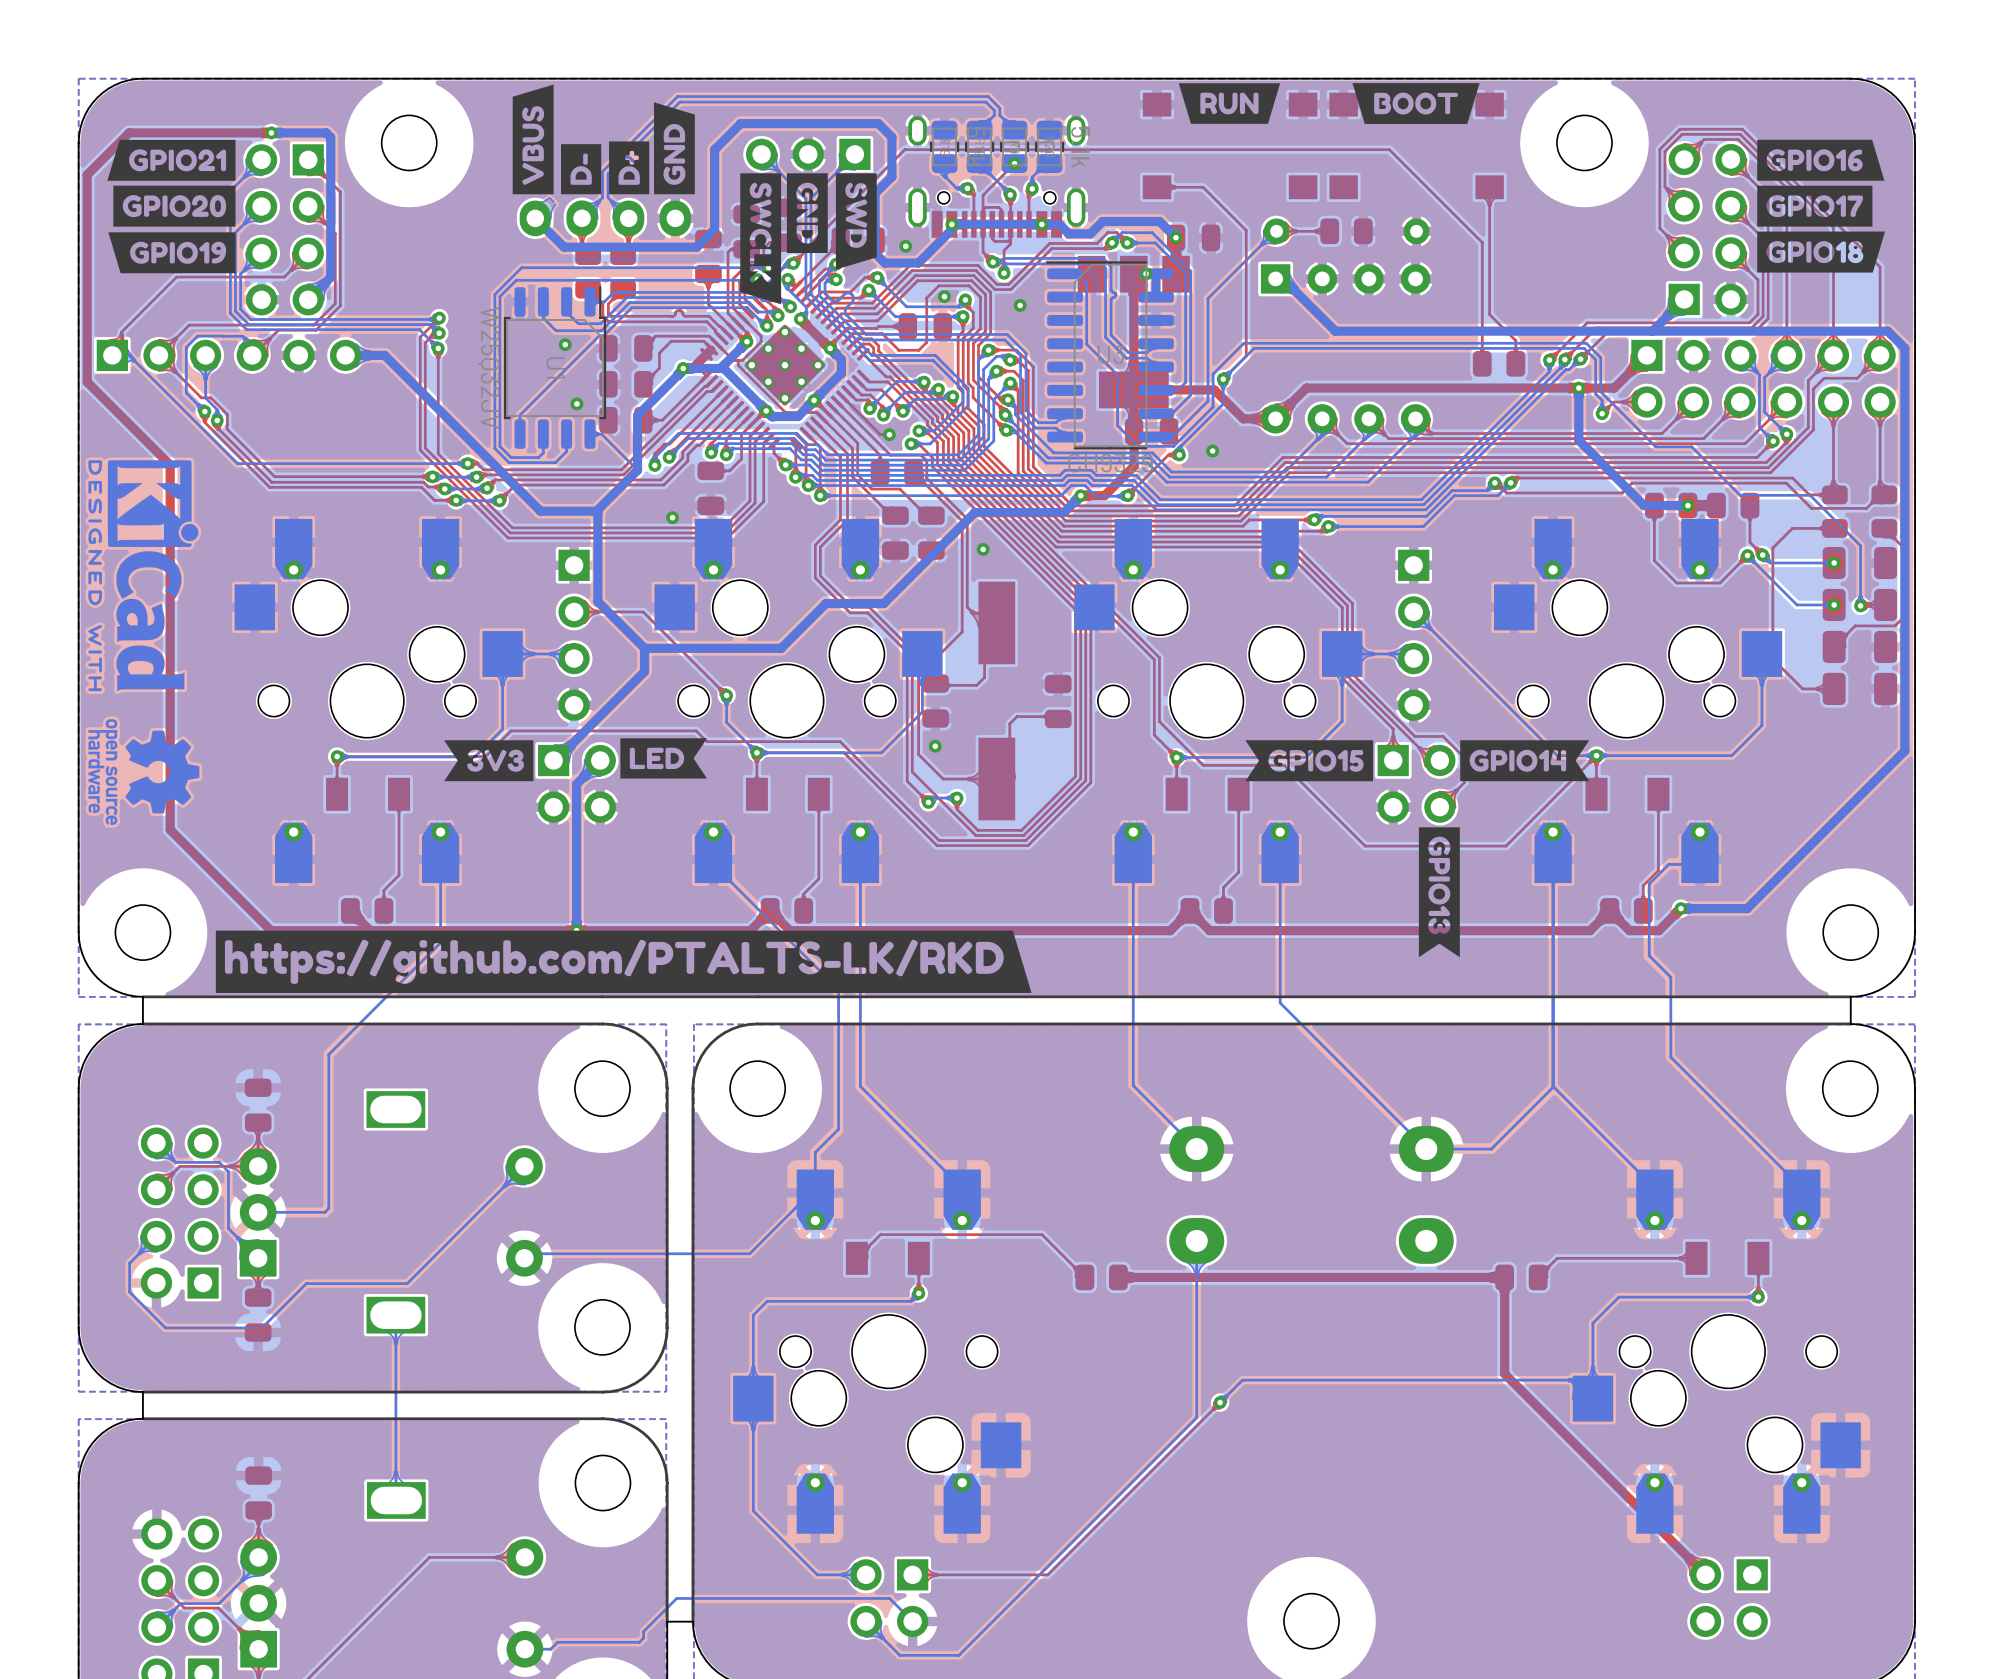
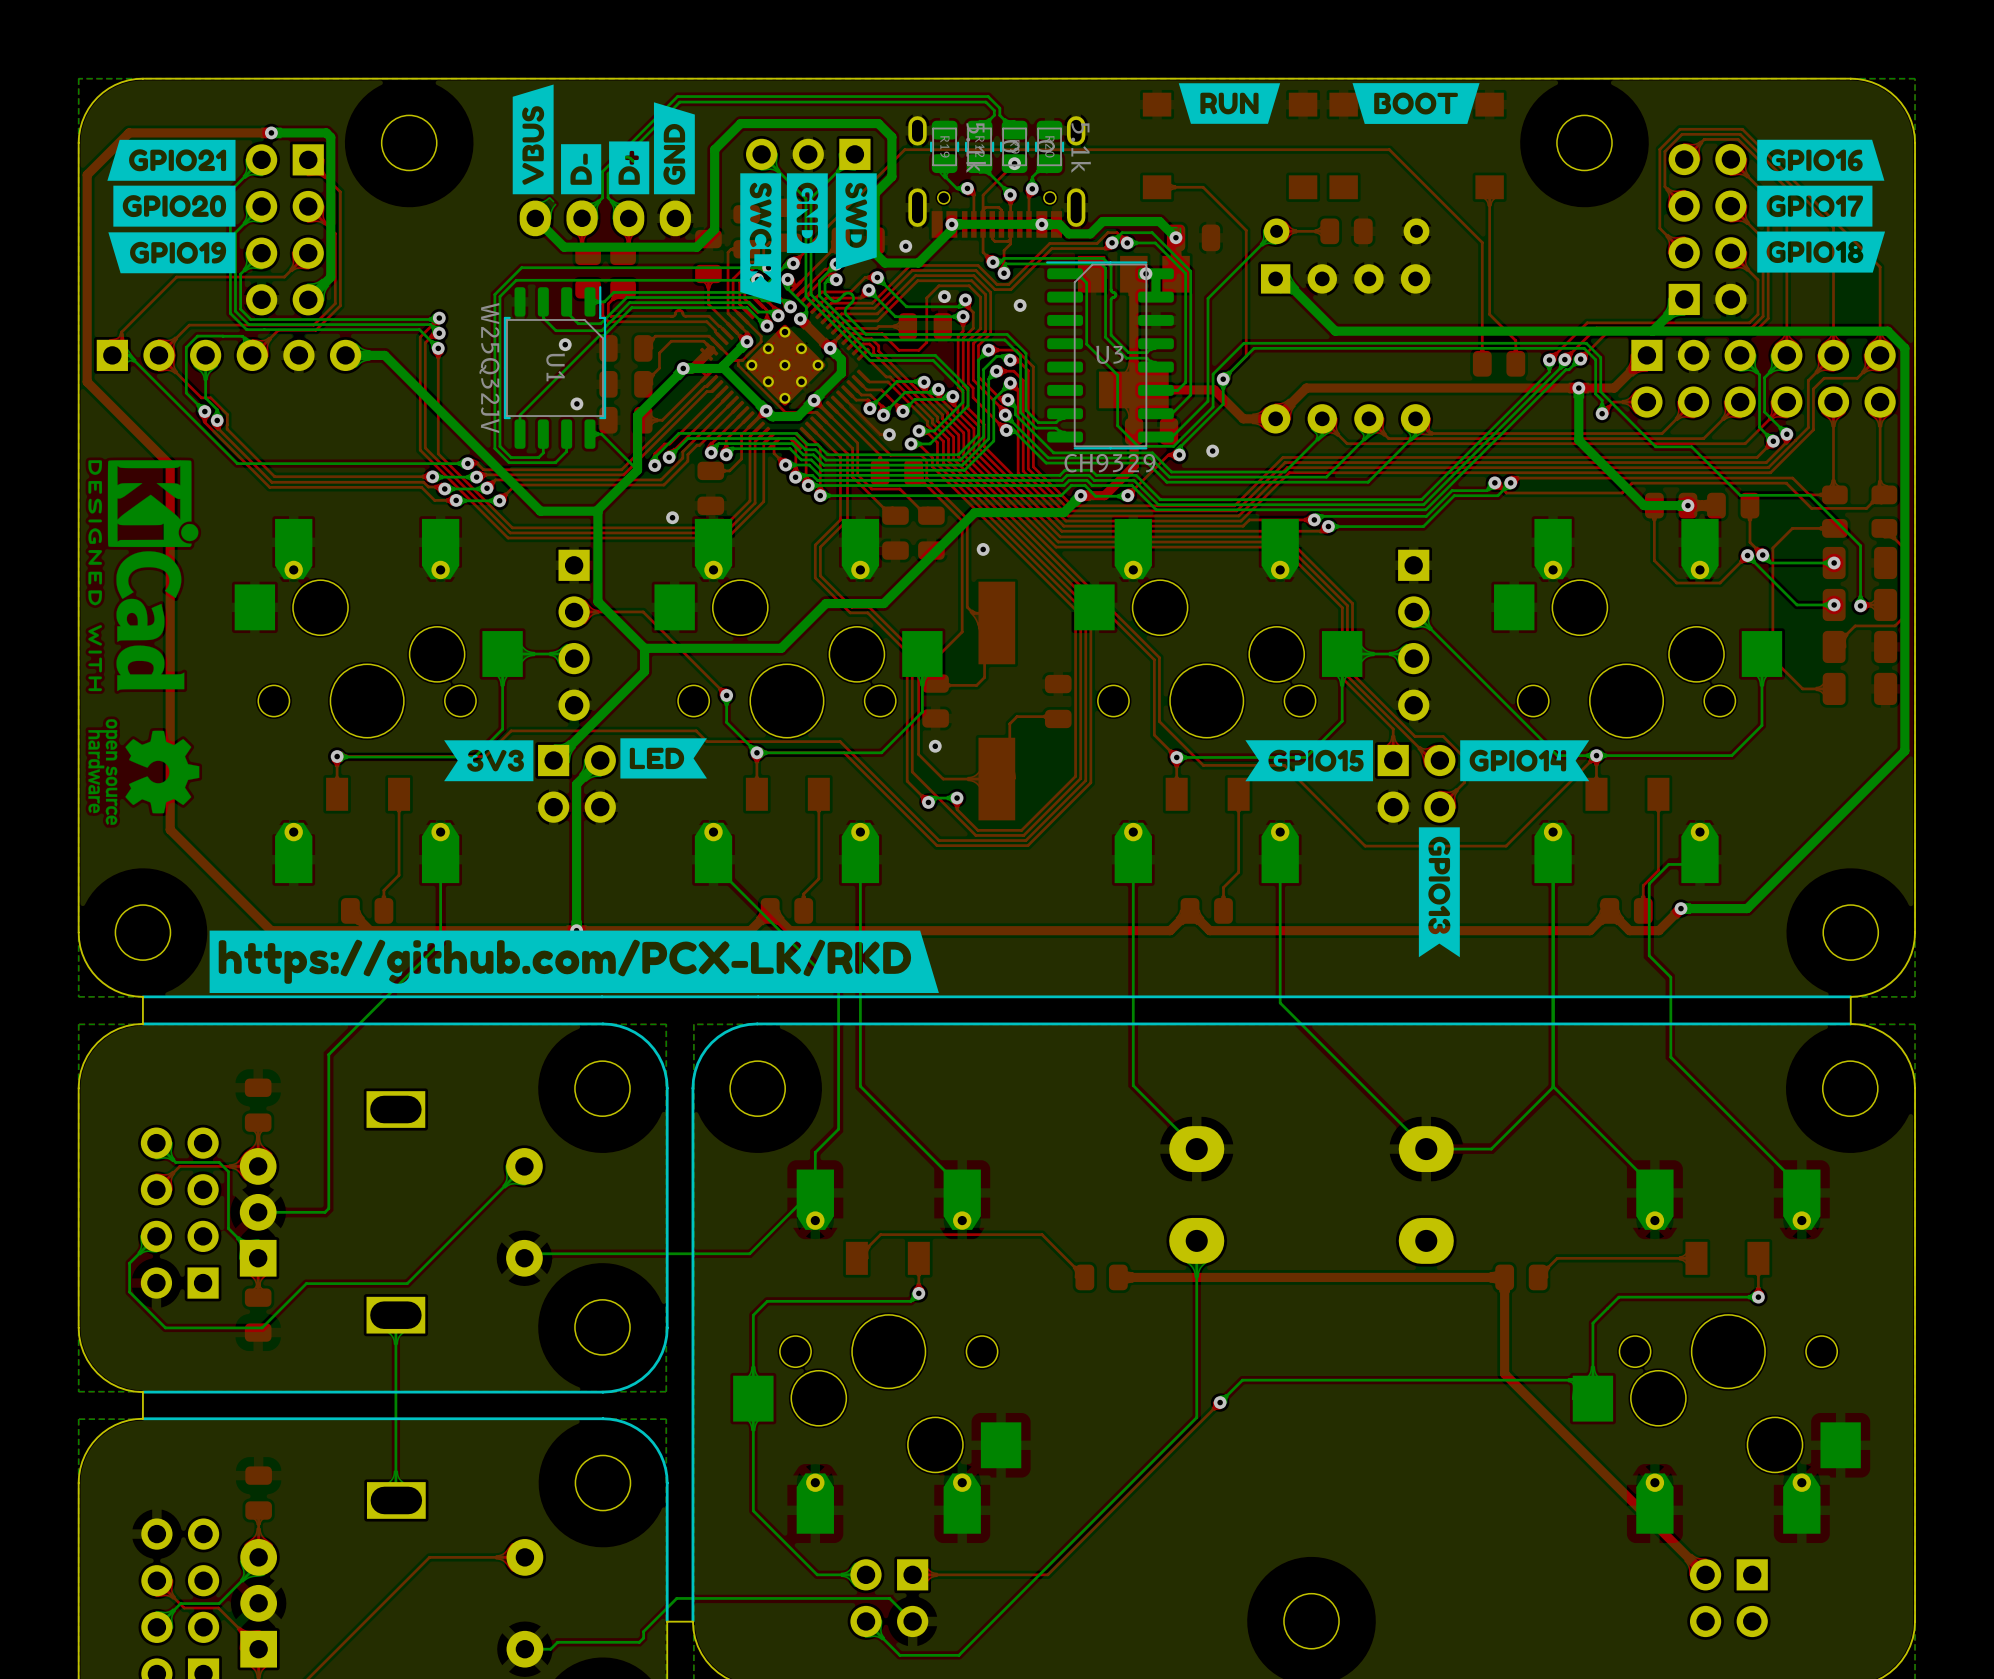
drawing: none -> [209, 930, 939, 993]
drawing: [215, 930, 1032, 993] -> none

